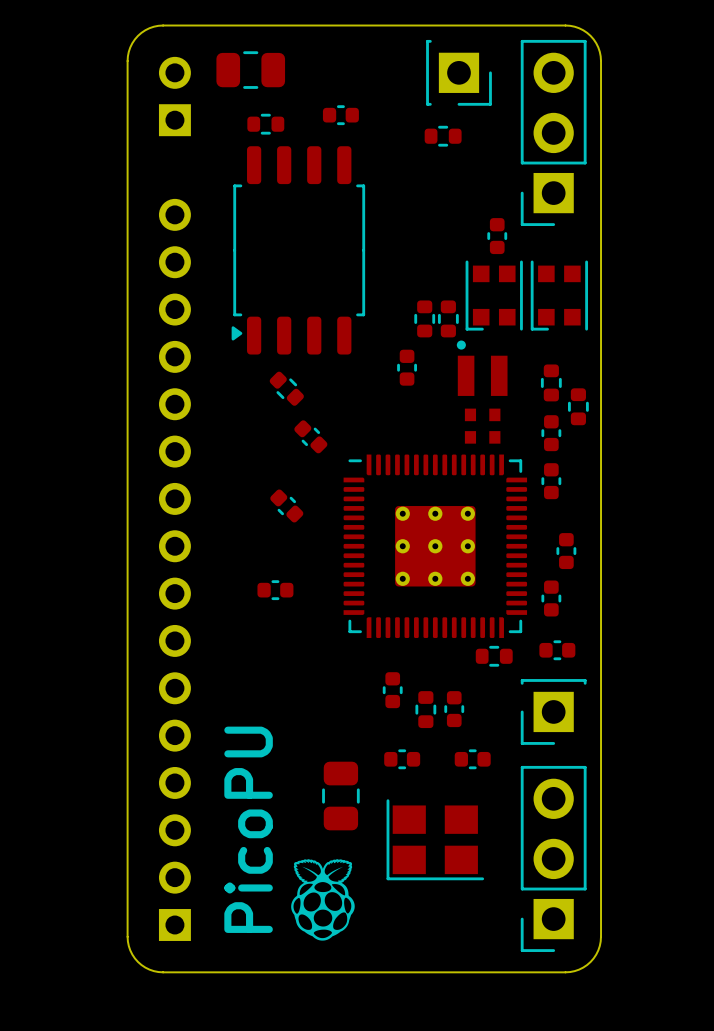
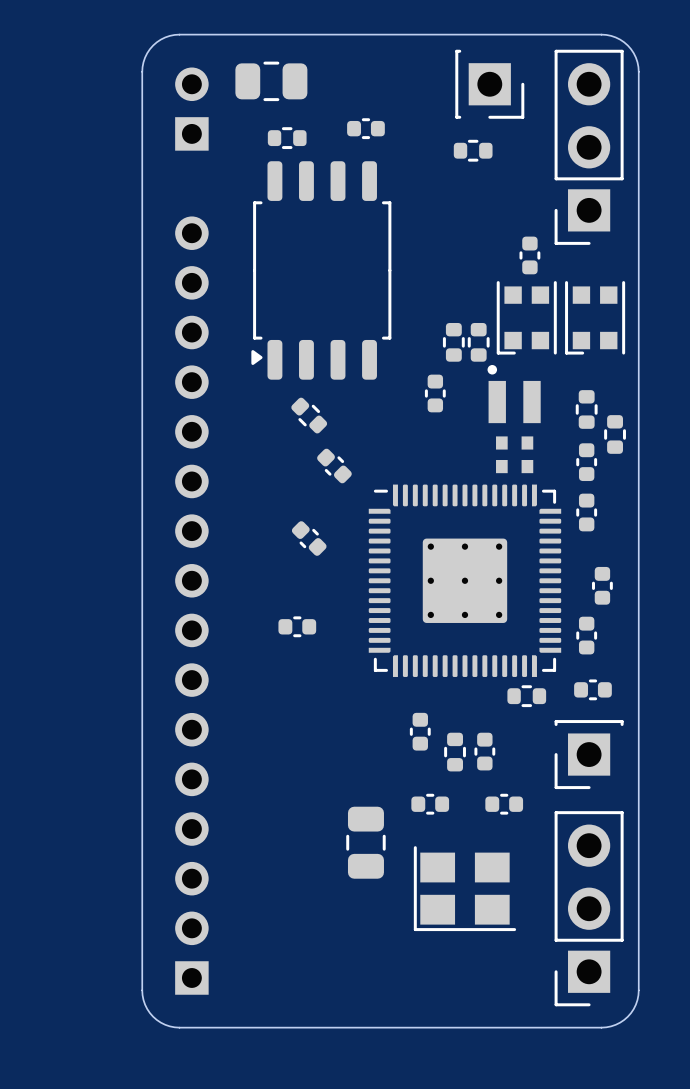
text: PicoPU (248, 829) -> none
drawing: [291, 859, 355, 941] -> none

